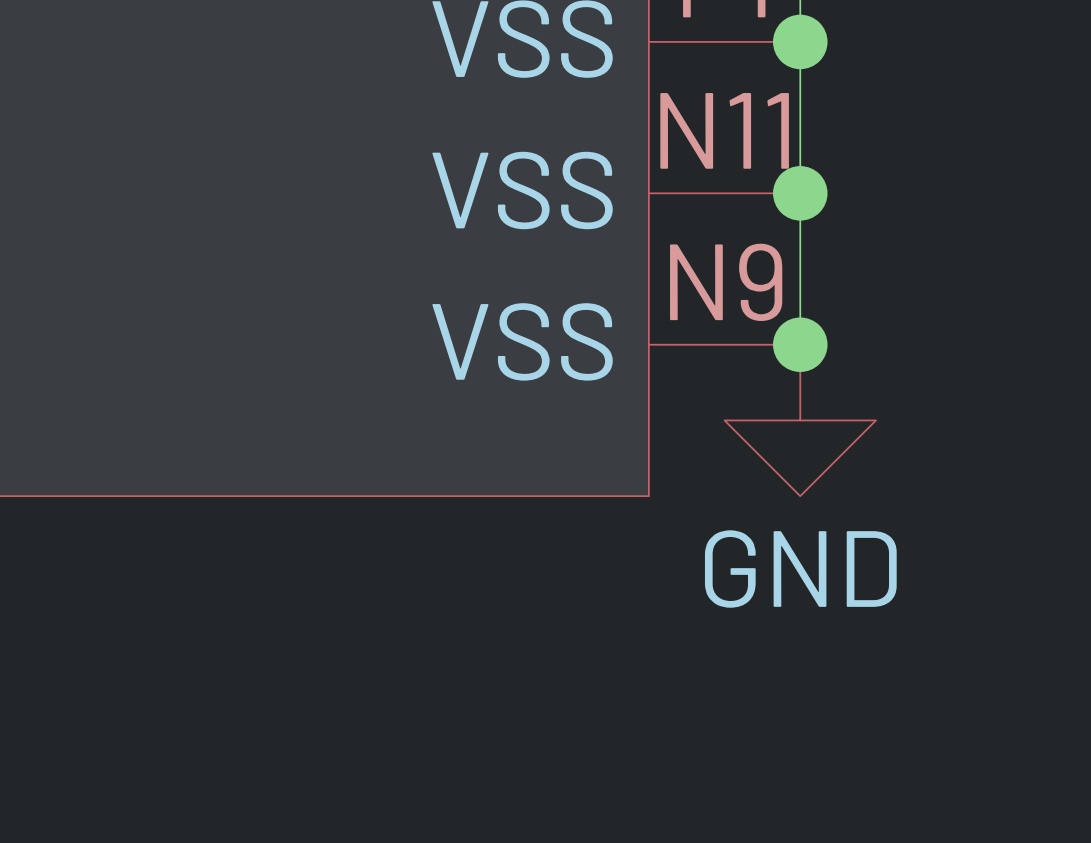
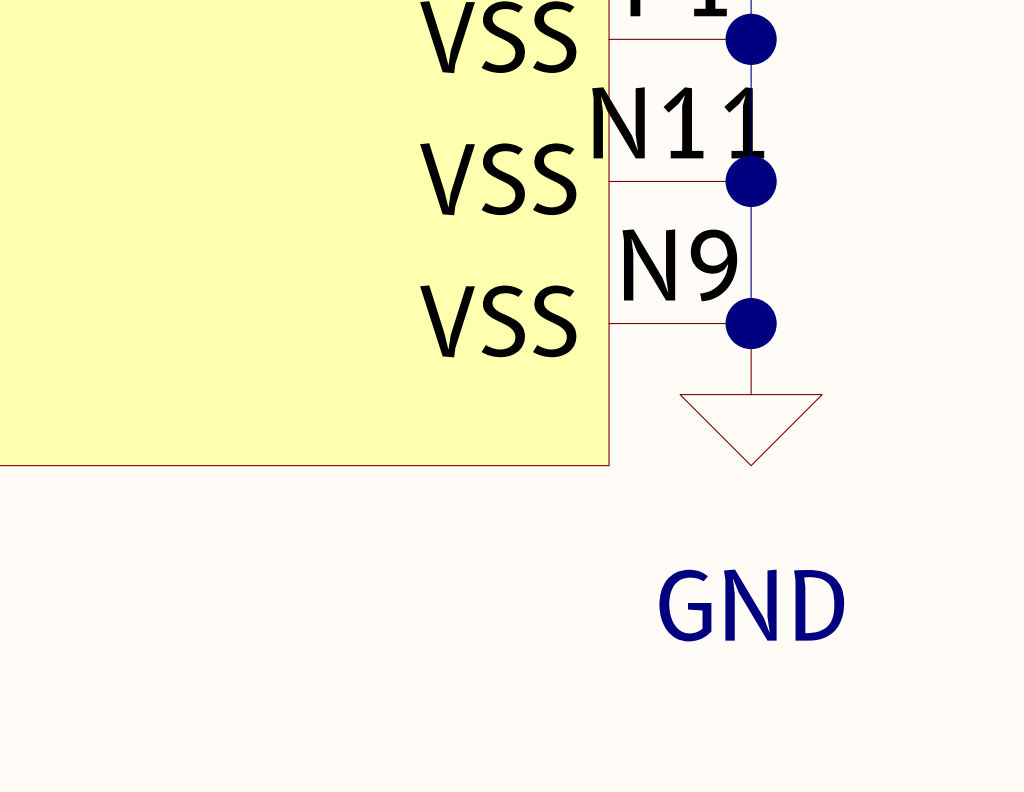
power symbol text position: GND (800, 569) -> GND (751, 605)

